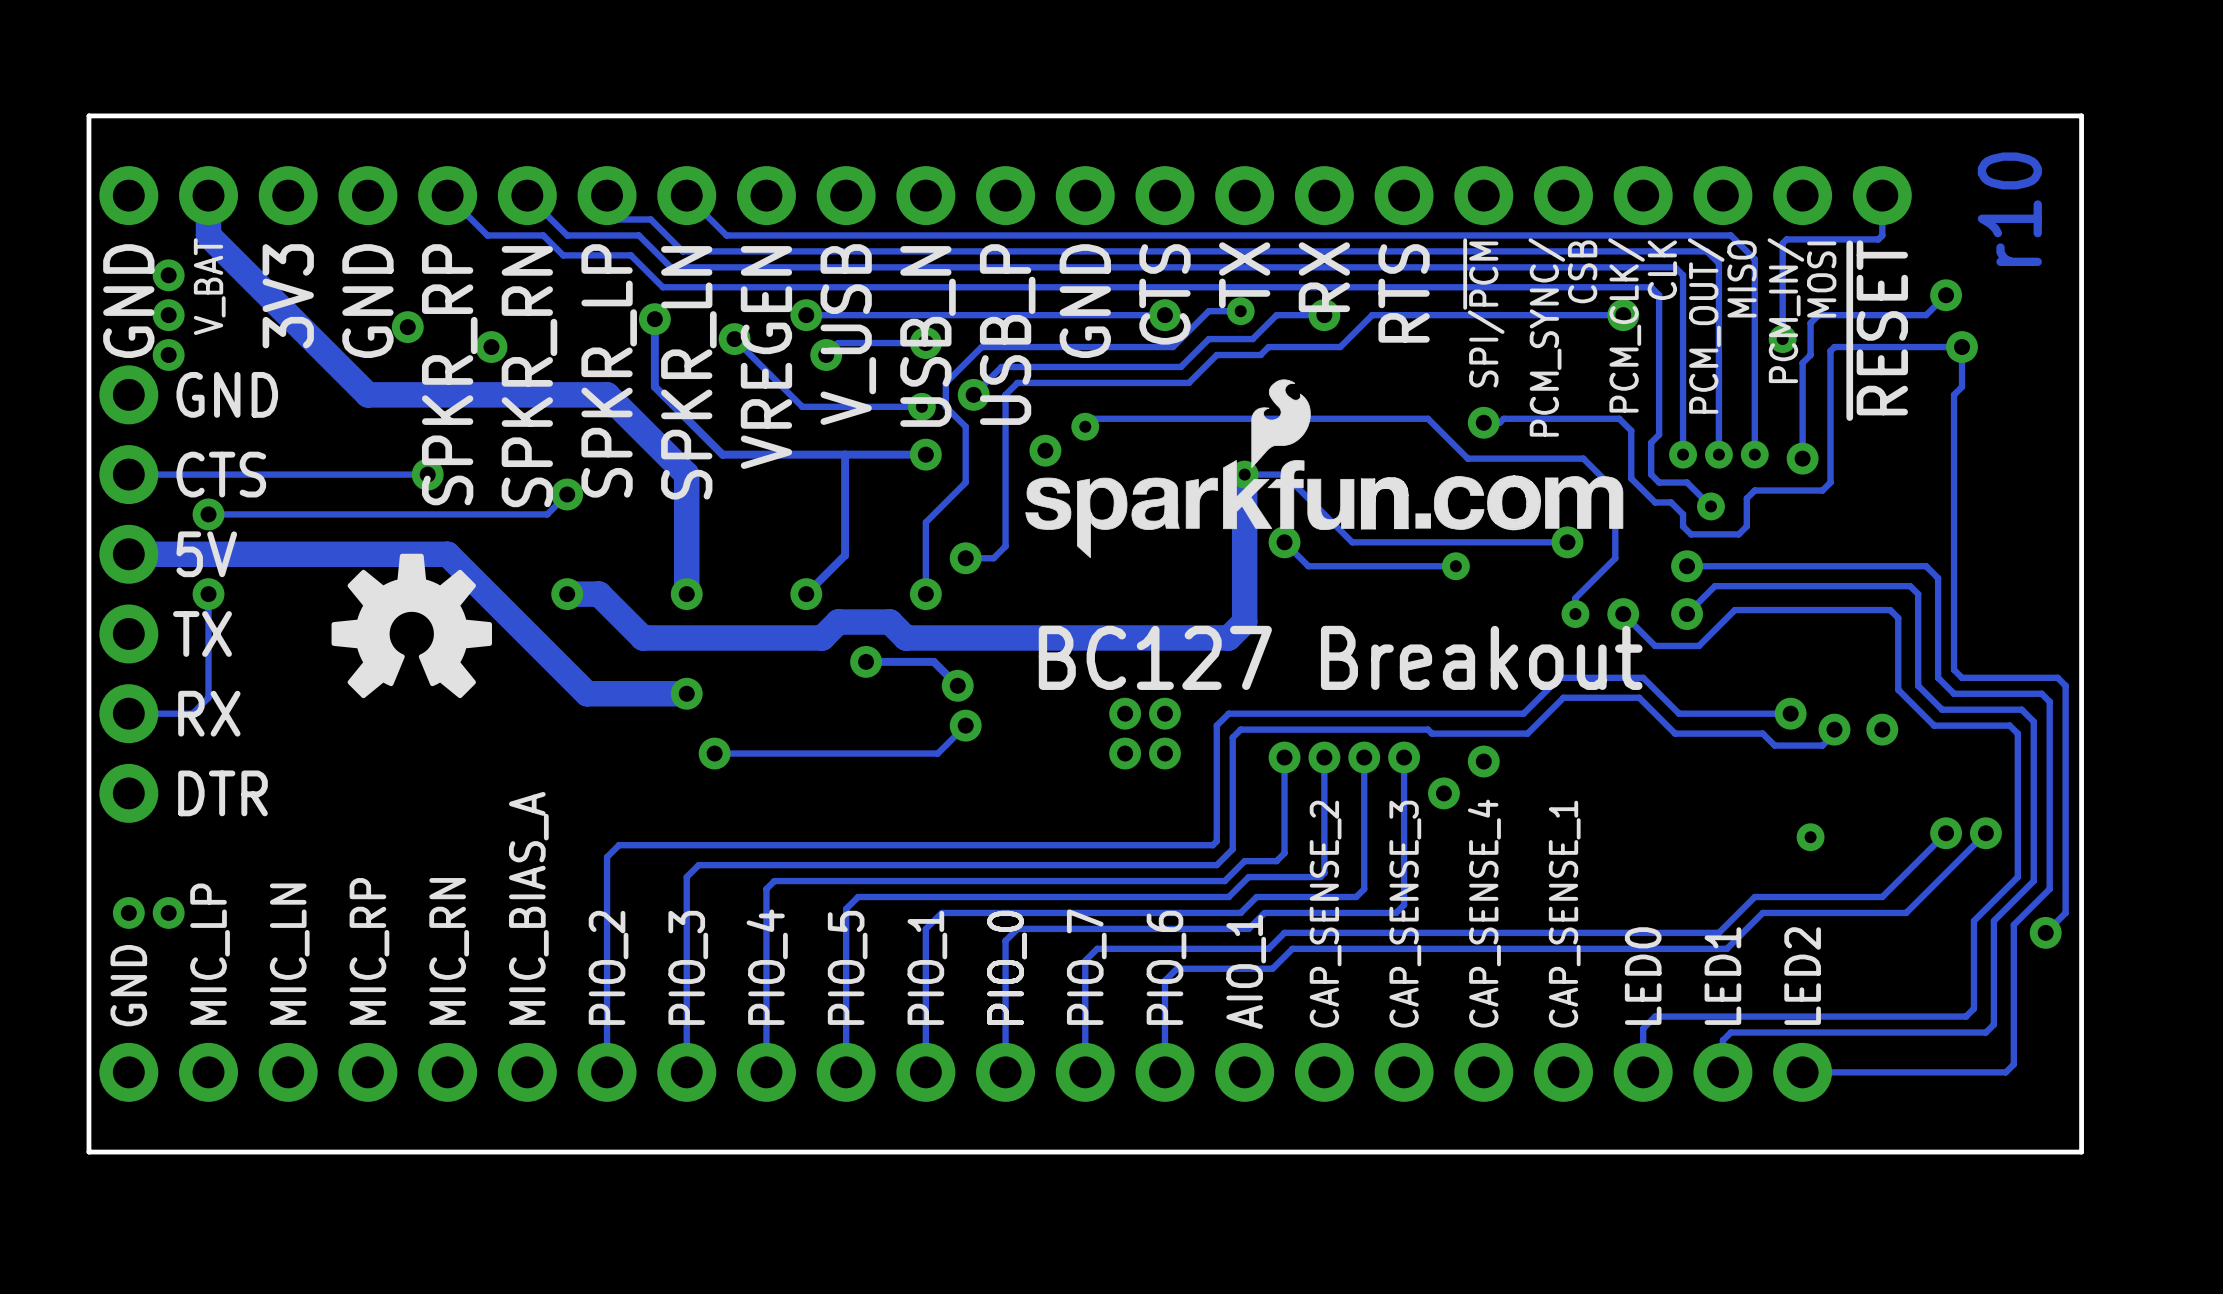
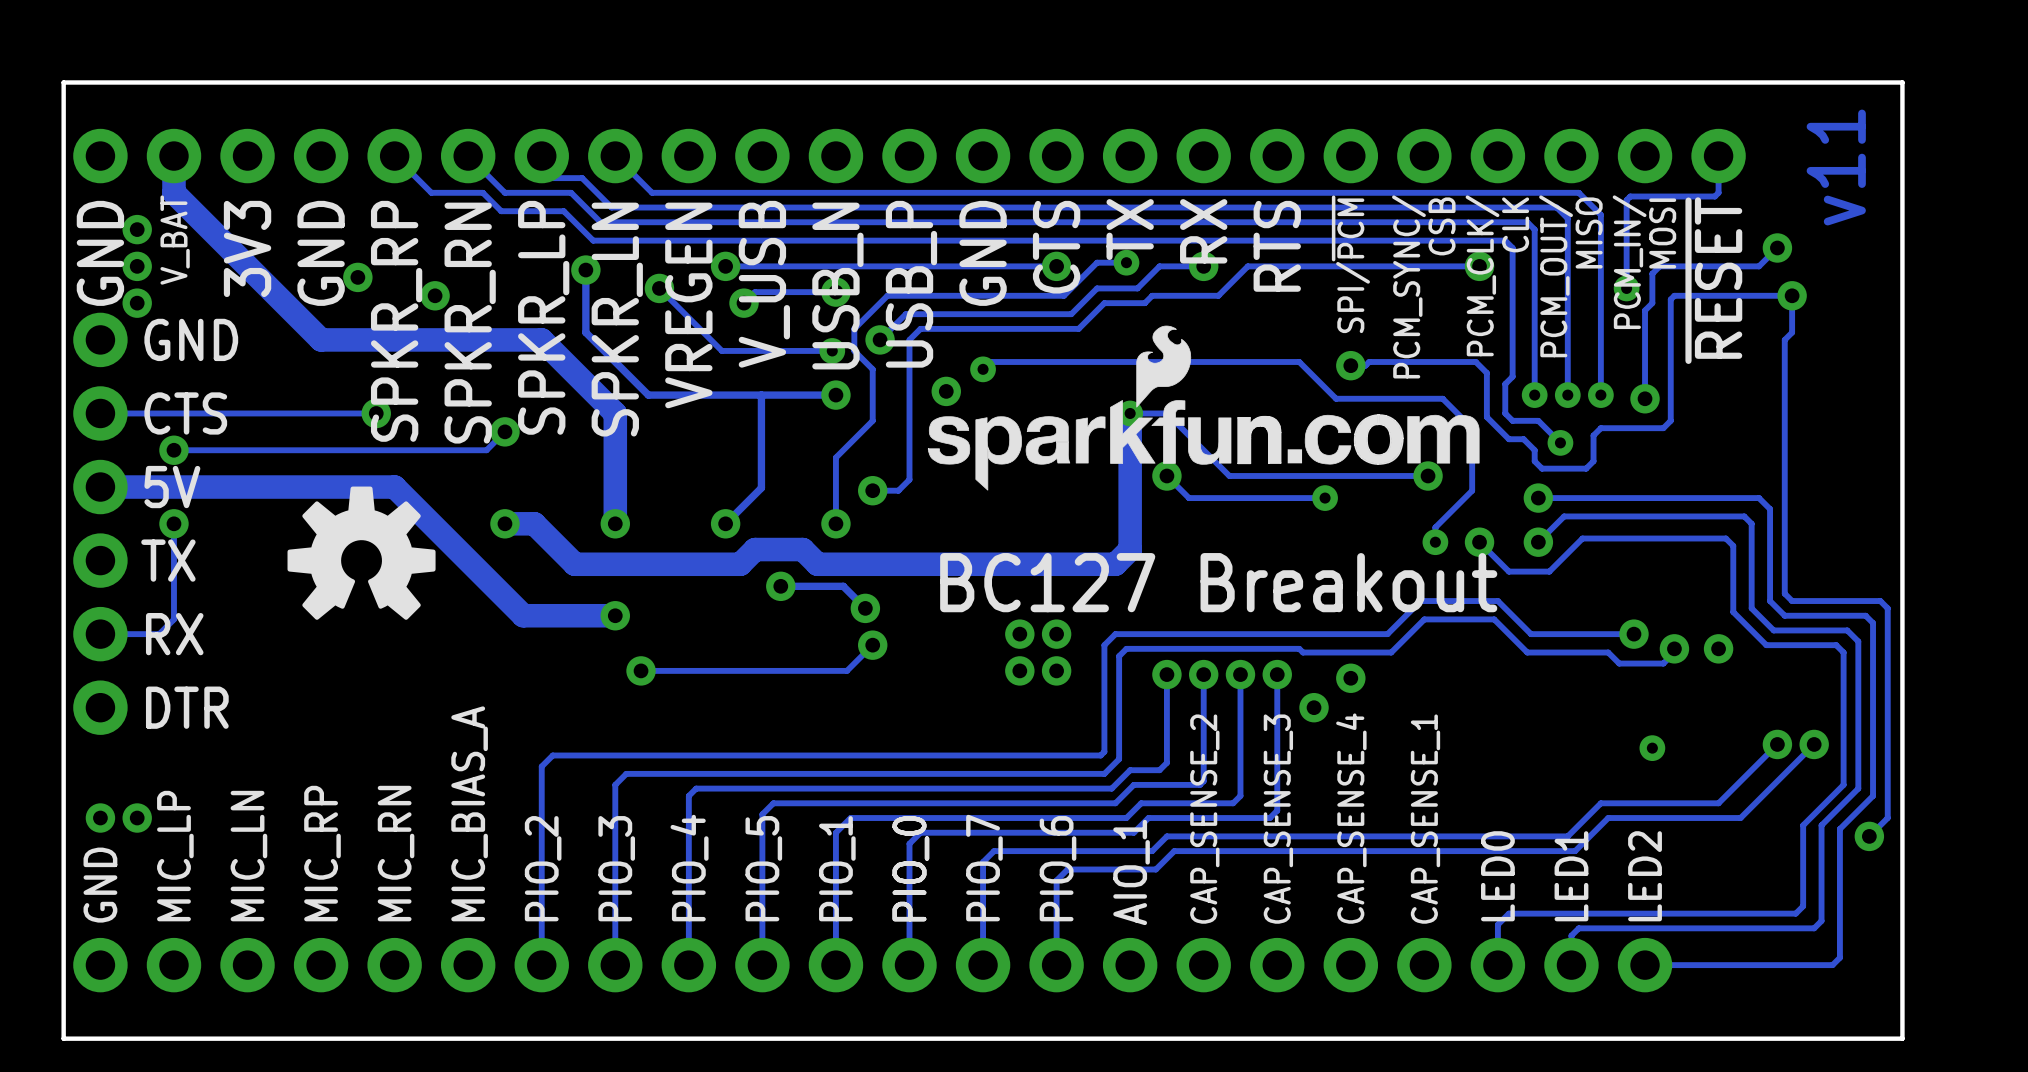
text: r10 (2009, 209) -> v11 (1836, 167)

